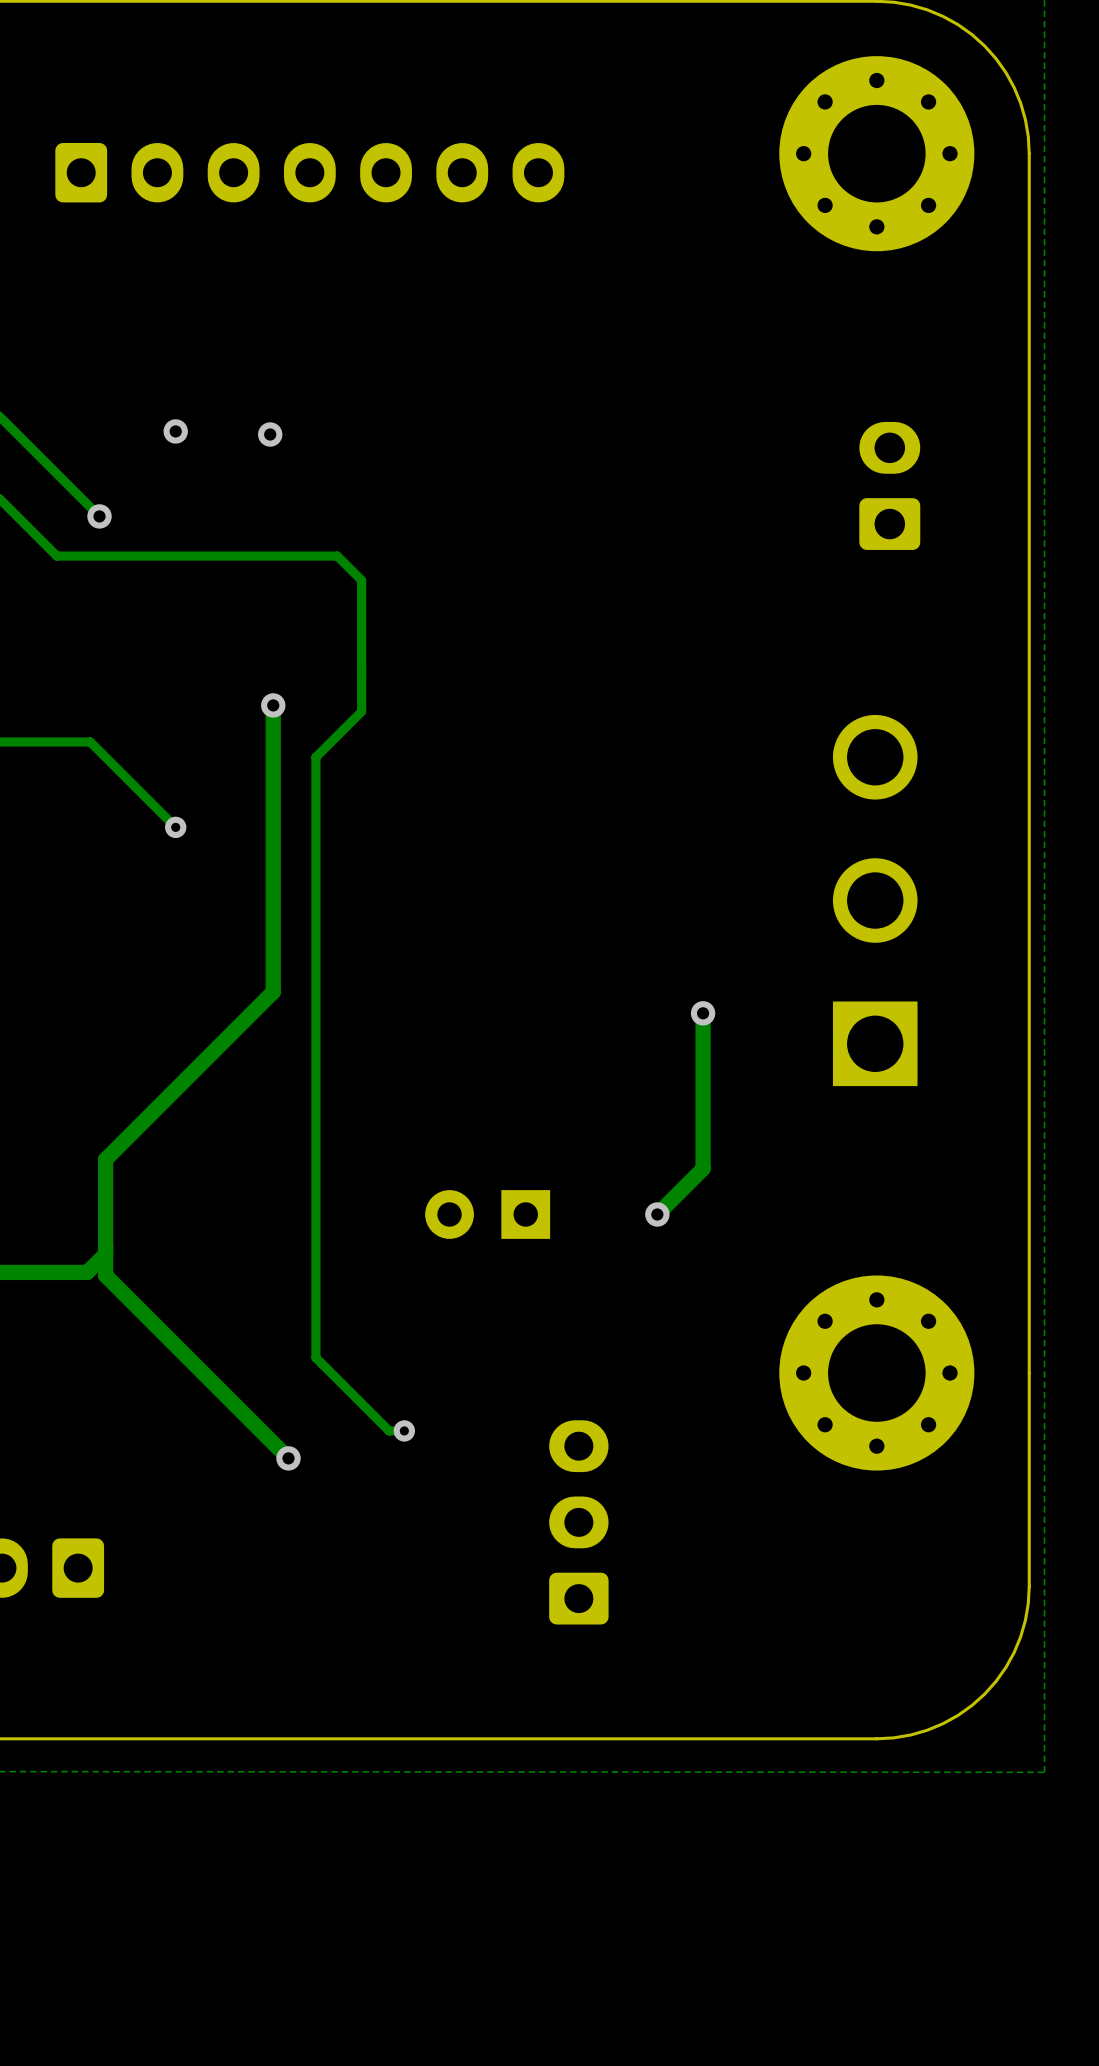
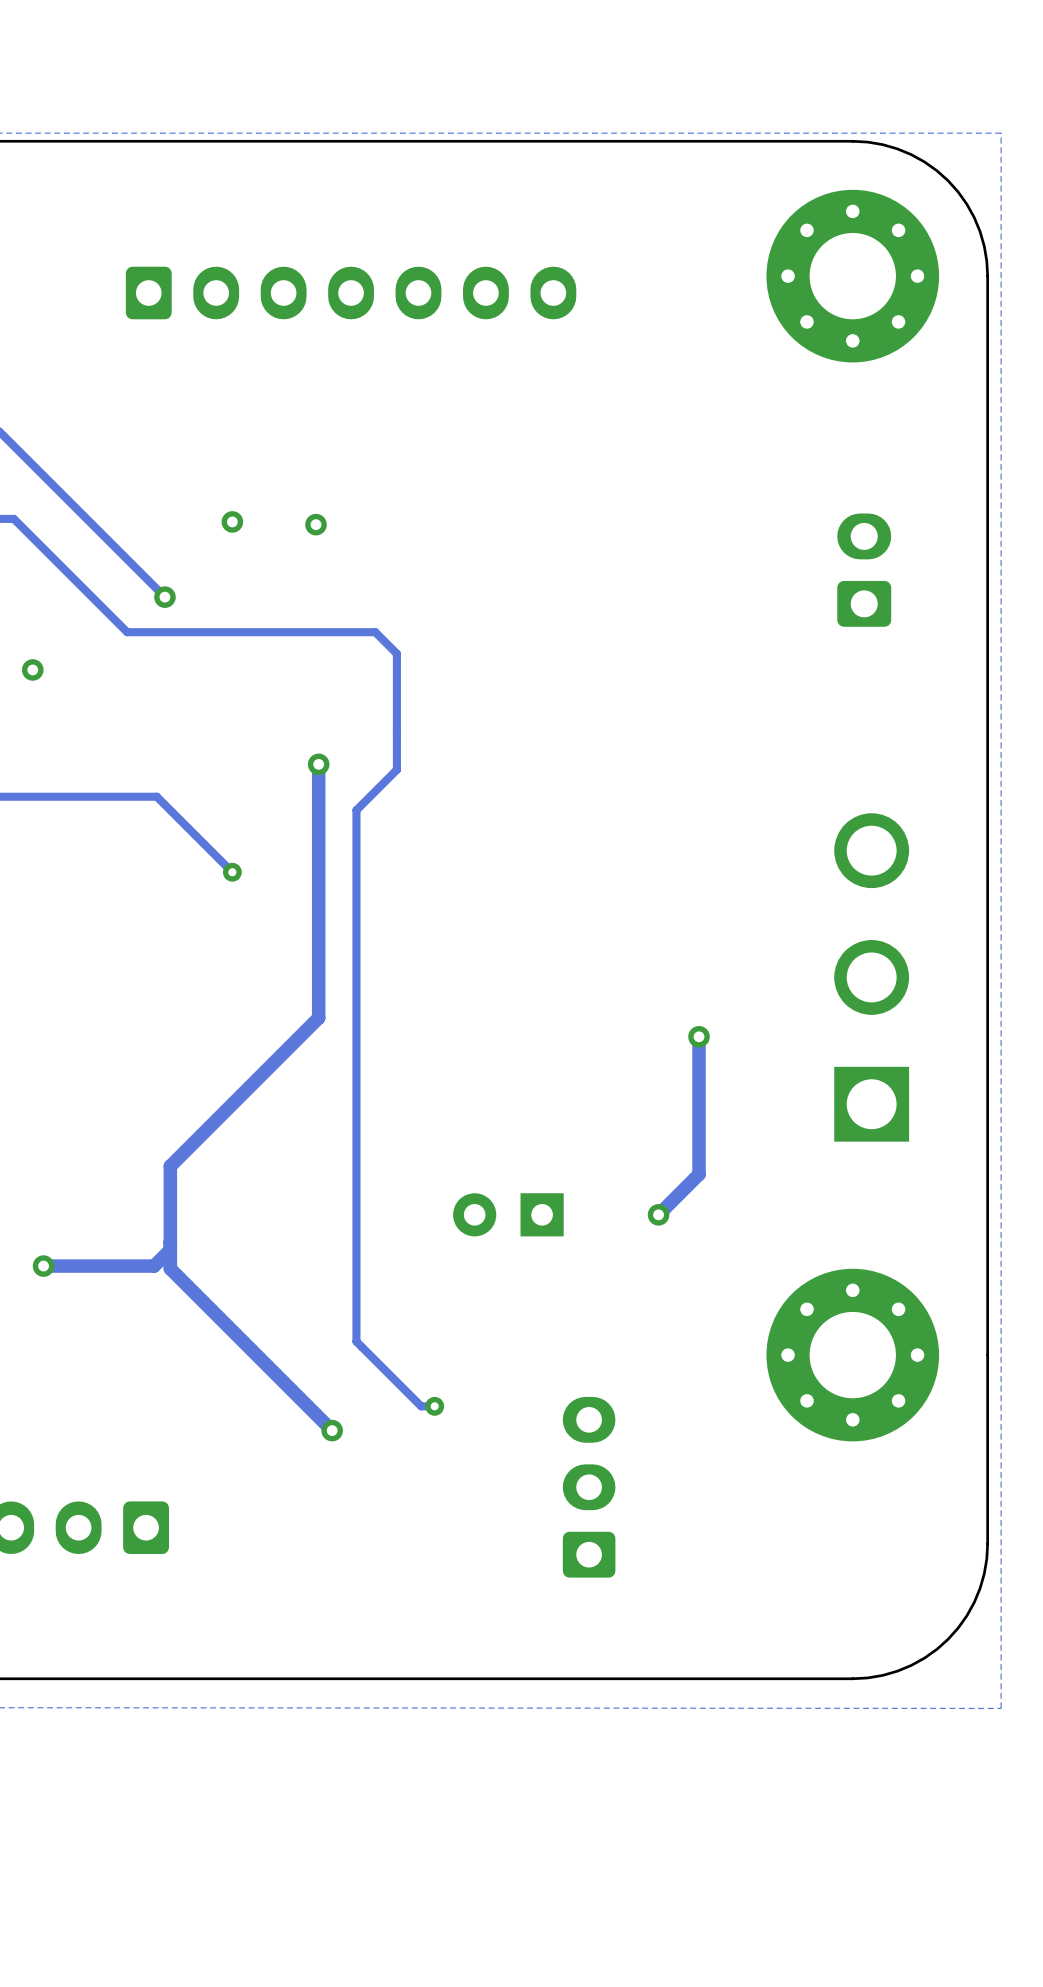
part position: (875, 900) -> (871, 977)

